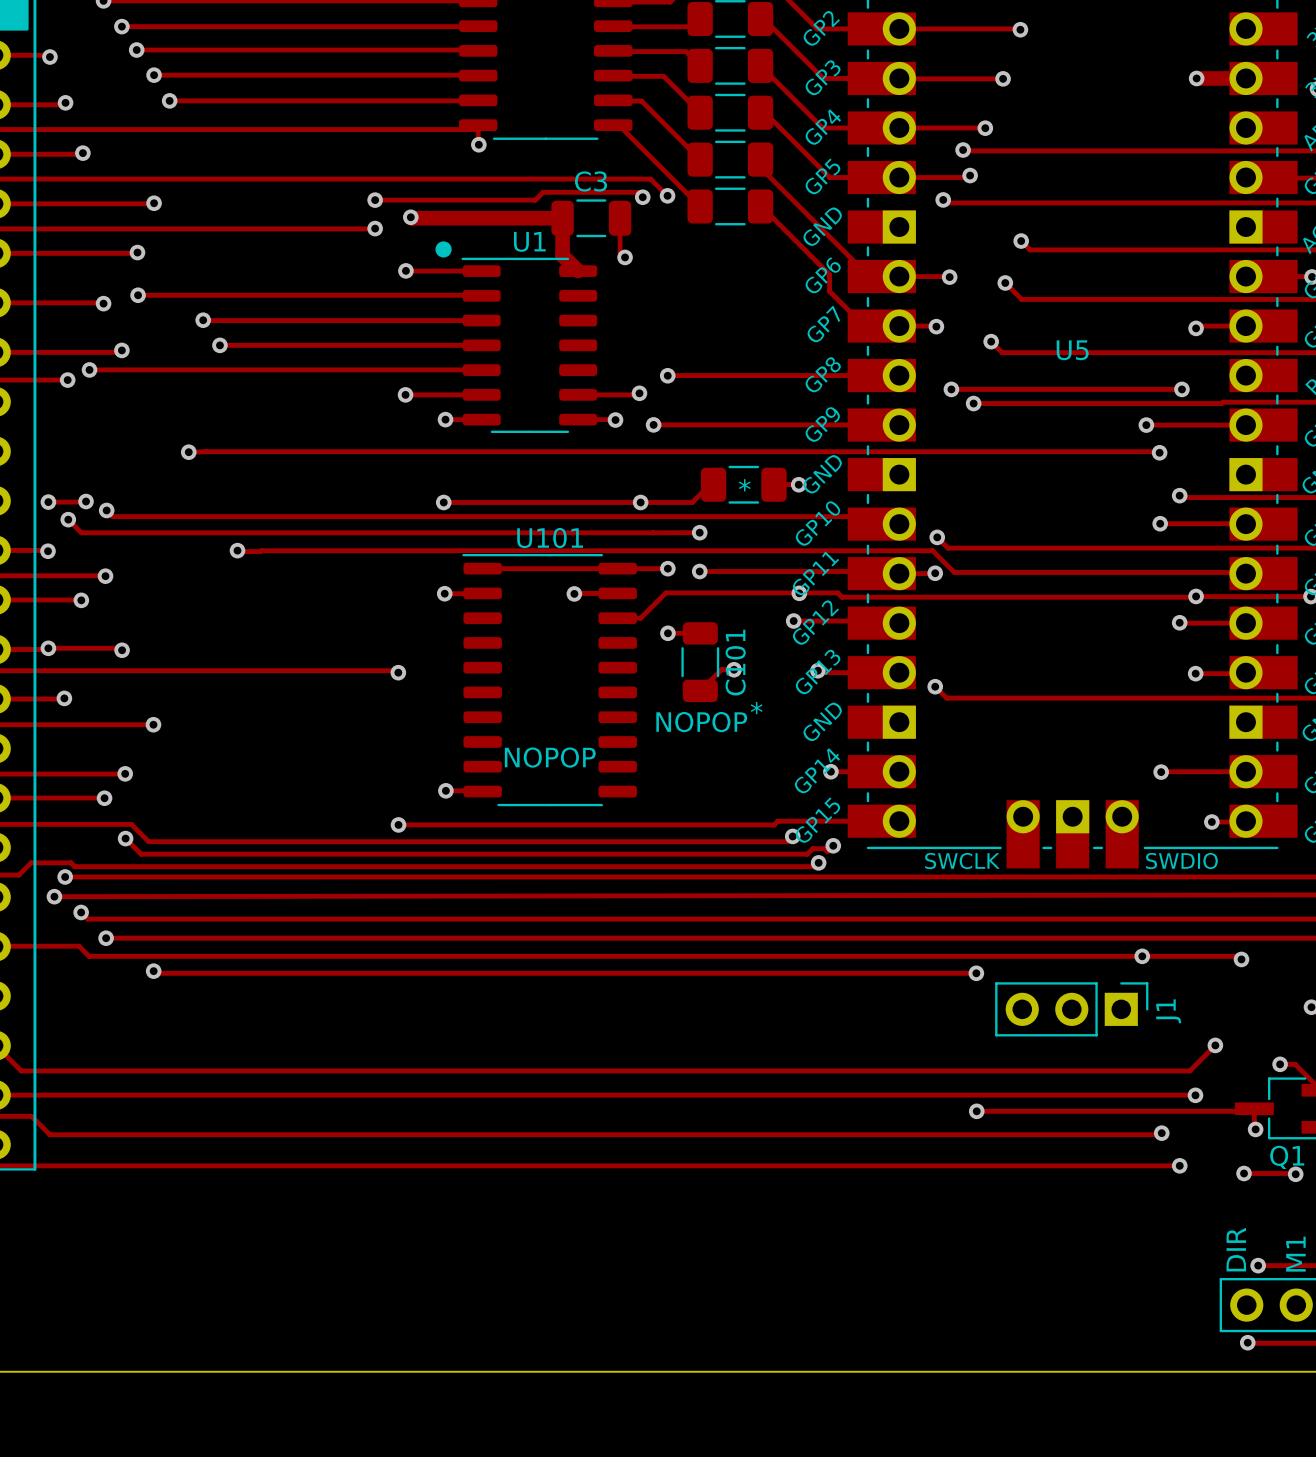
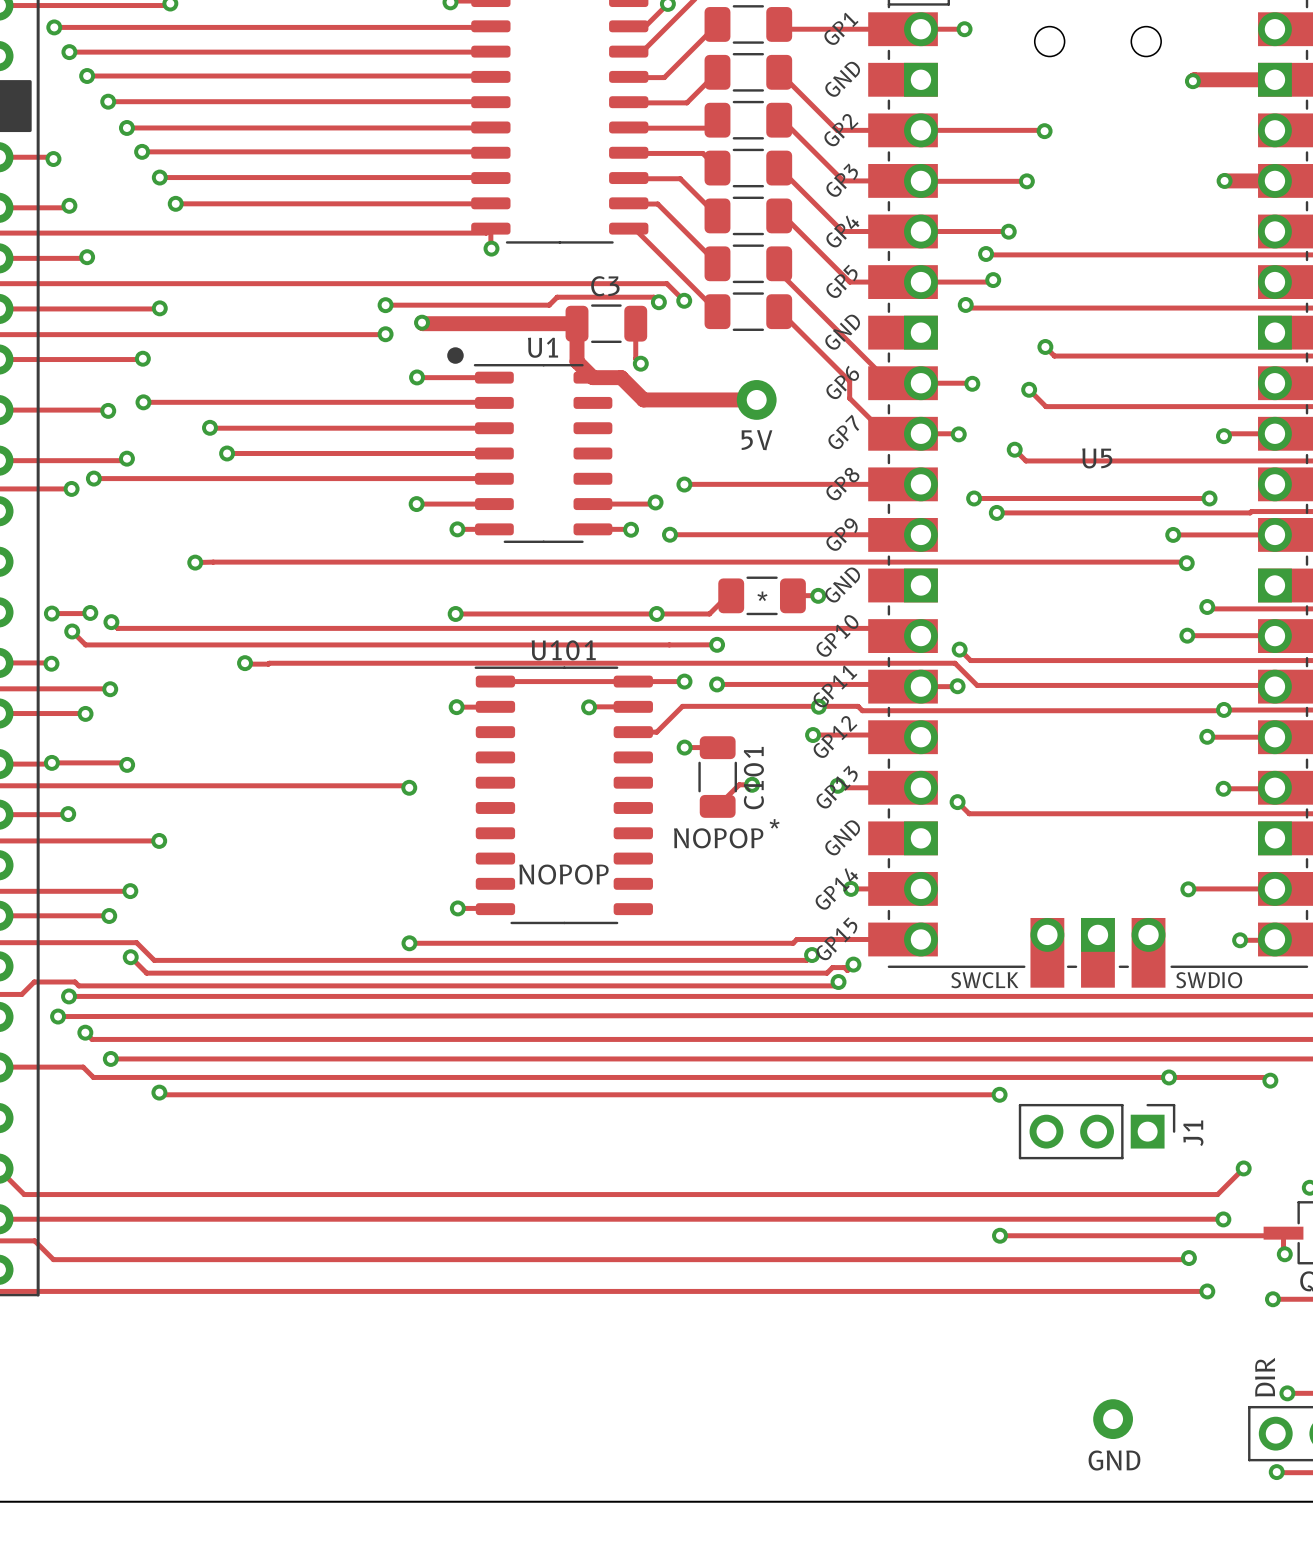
track: none -> (592, 377) (621, 377) (643, 399) (756, 399)
part: none -> (756, 399)
text: none -> 5V (757, 440)
part: none -> (1113, 1419)
text: none -> GND (1114, 1460)

